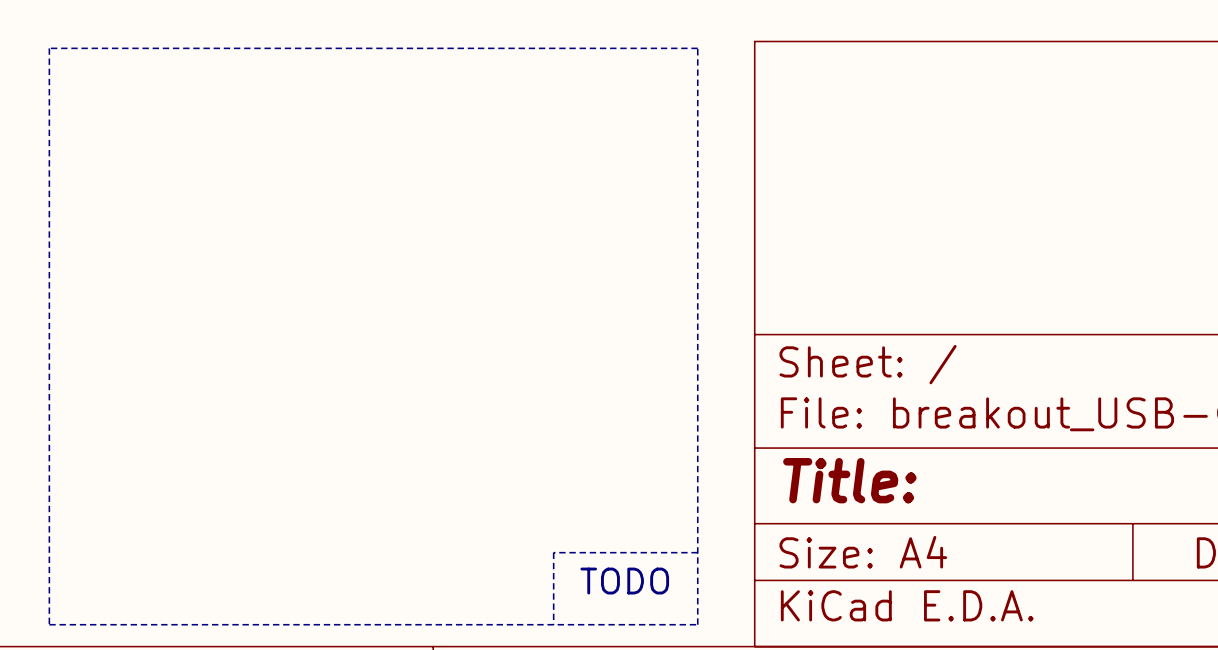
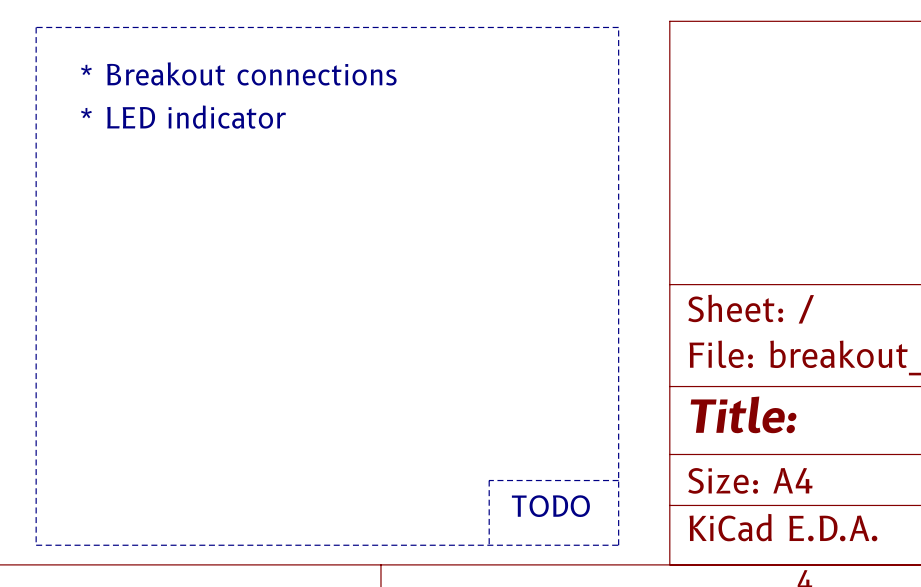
text: none -> * Breakout connections (238, 73)
text: none -> * LED indicator (183, 117)

